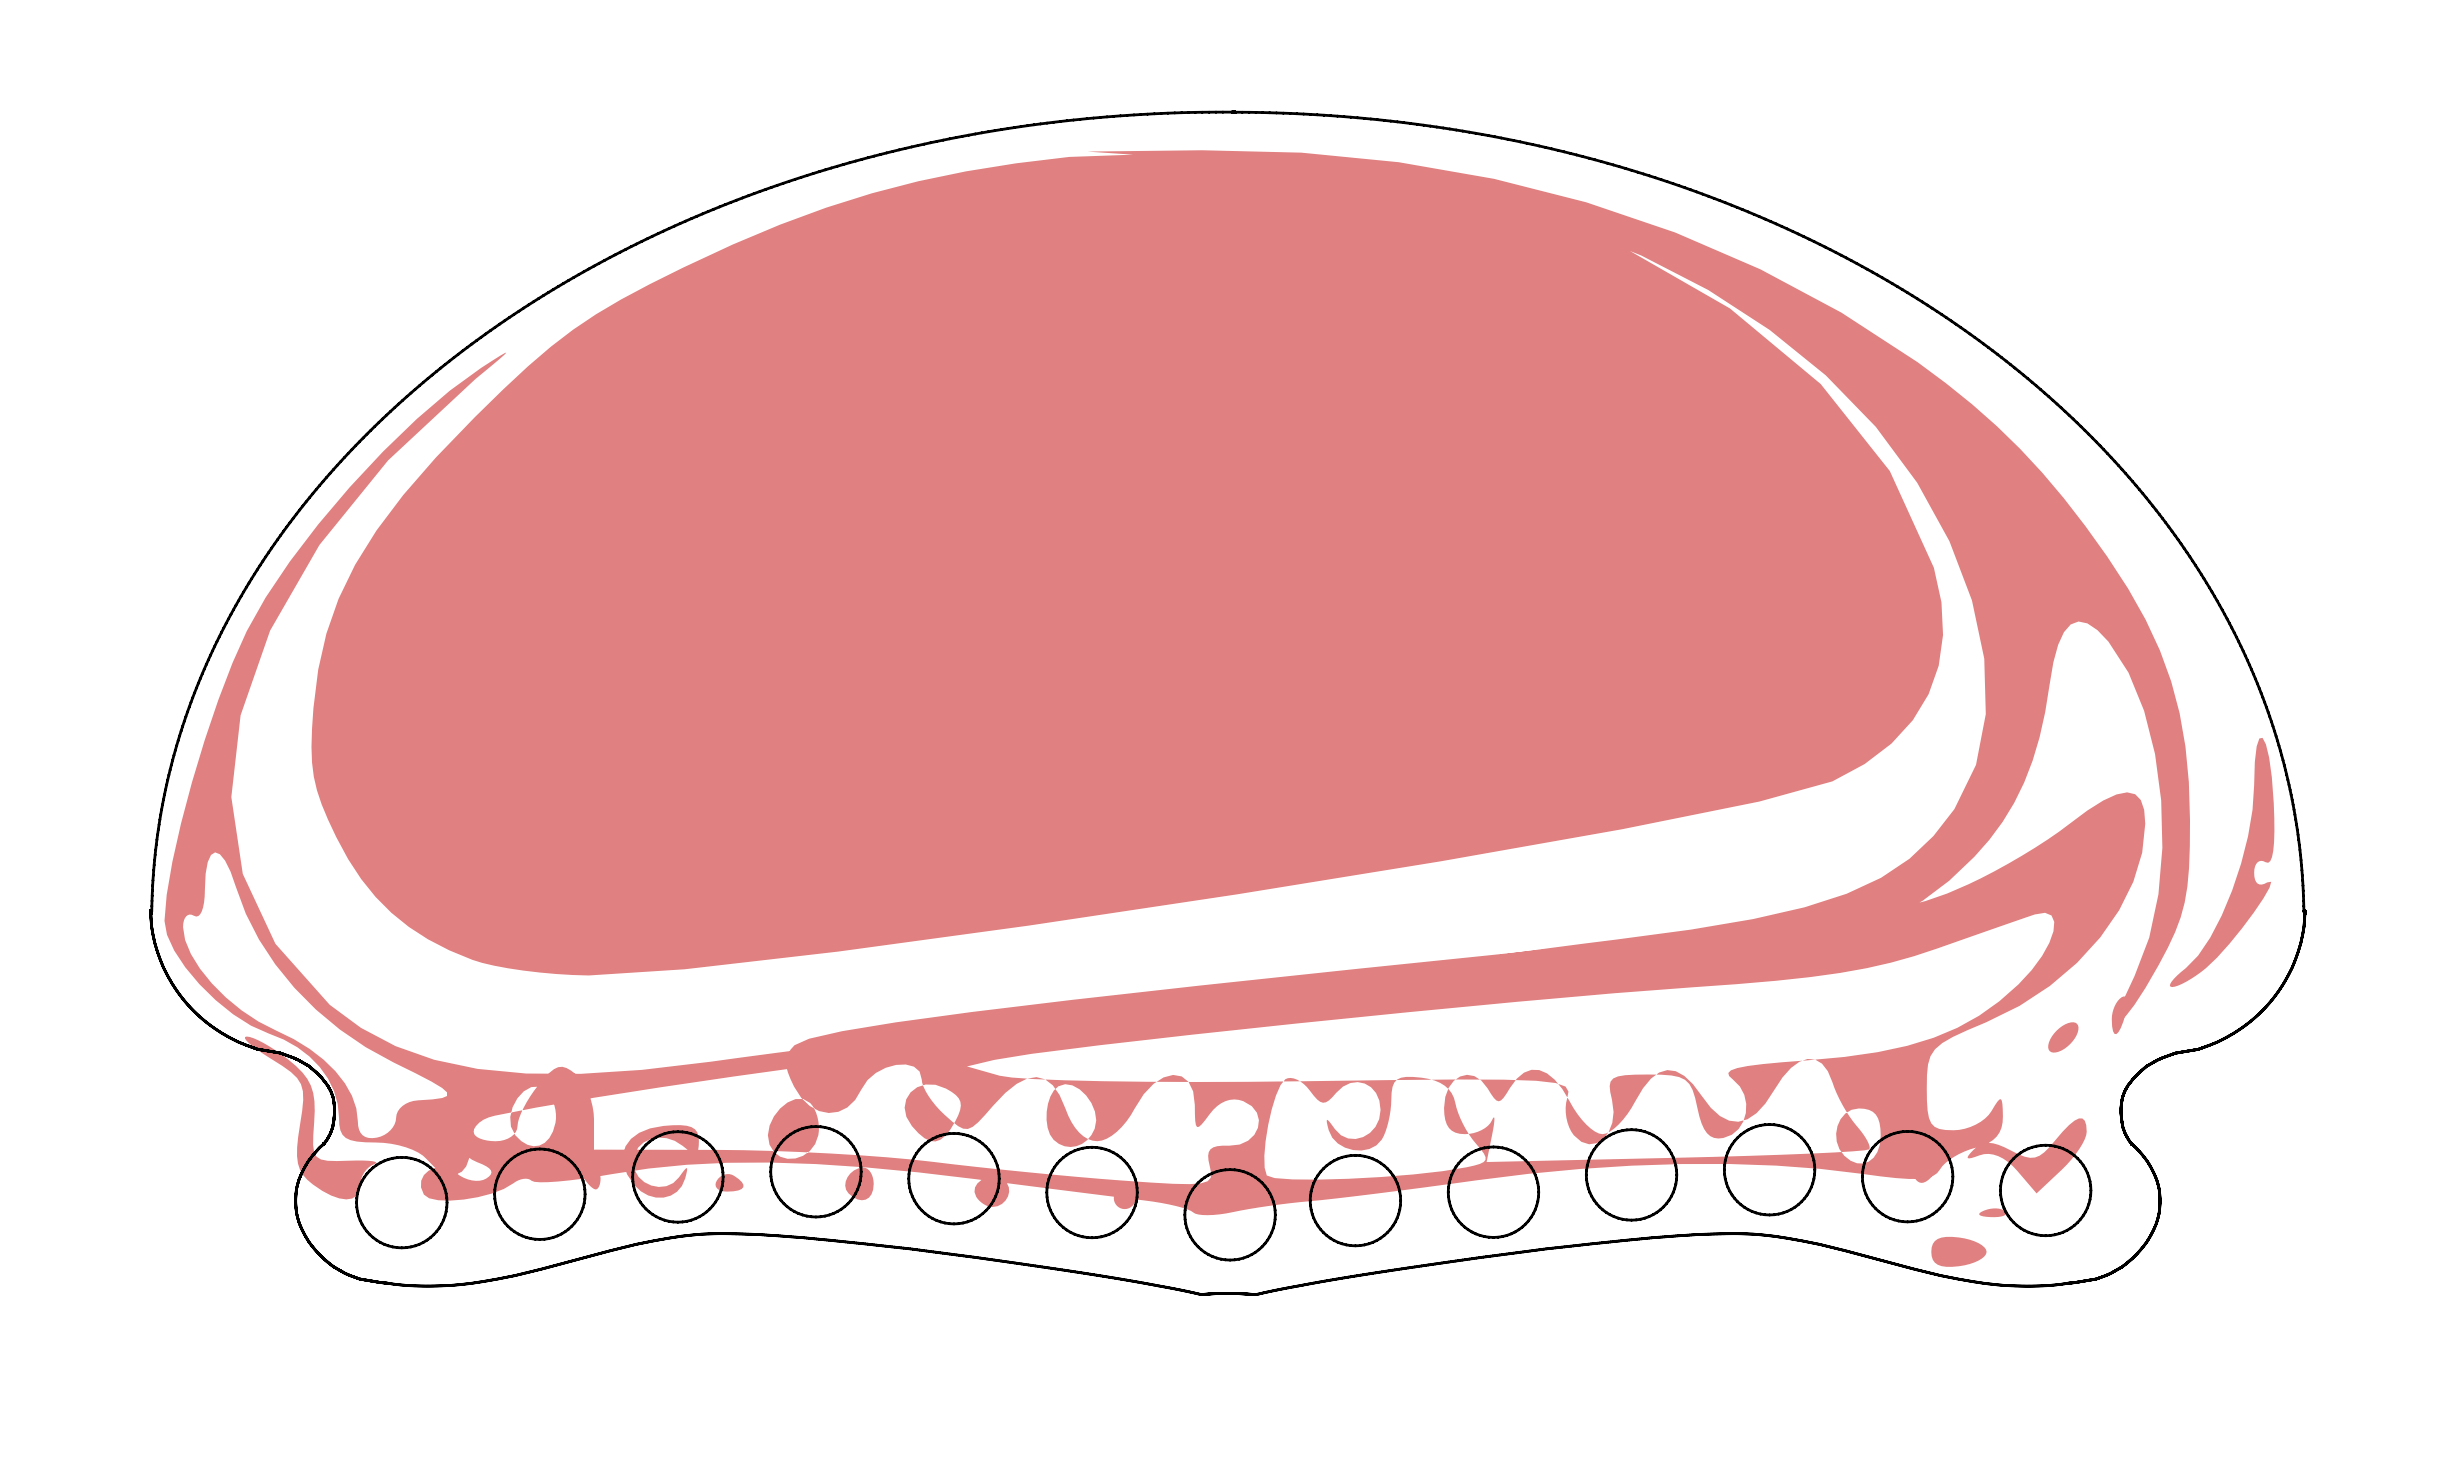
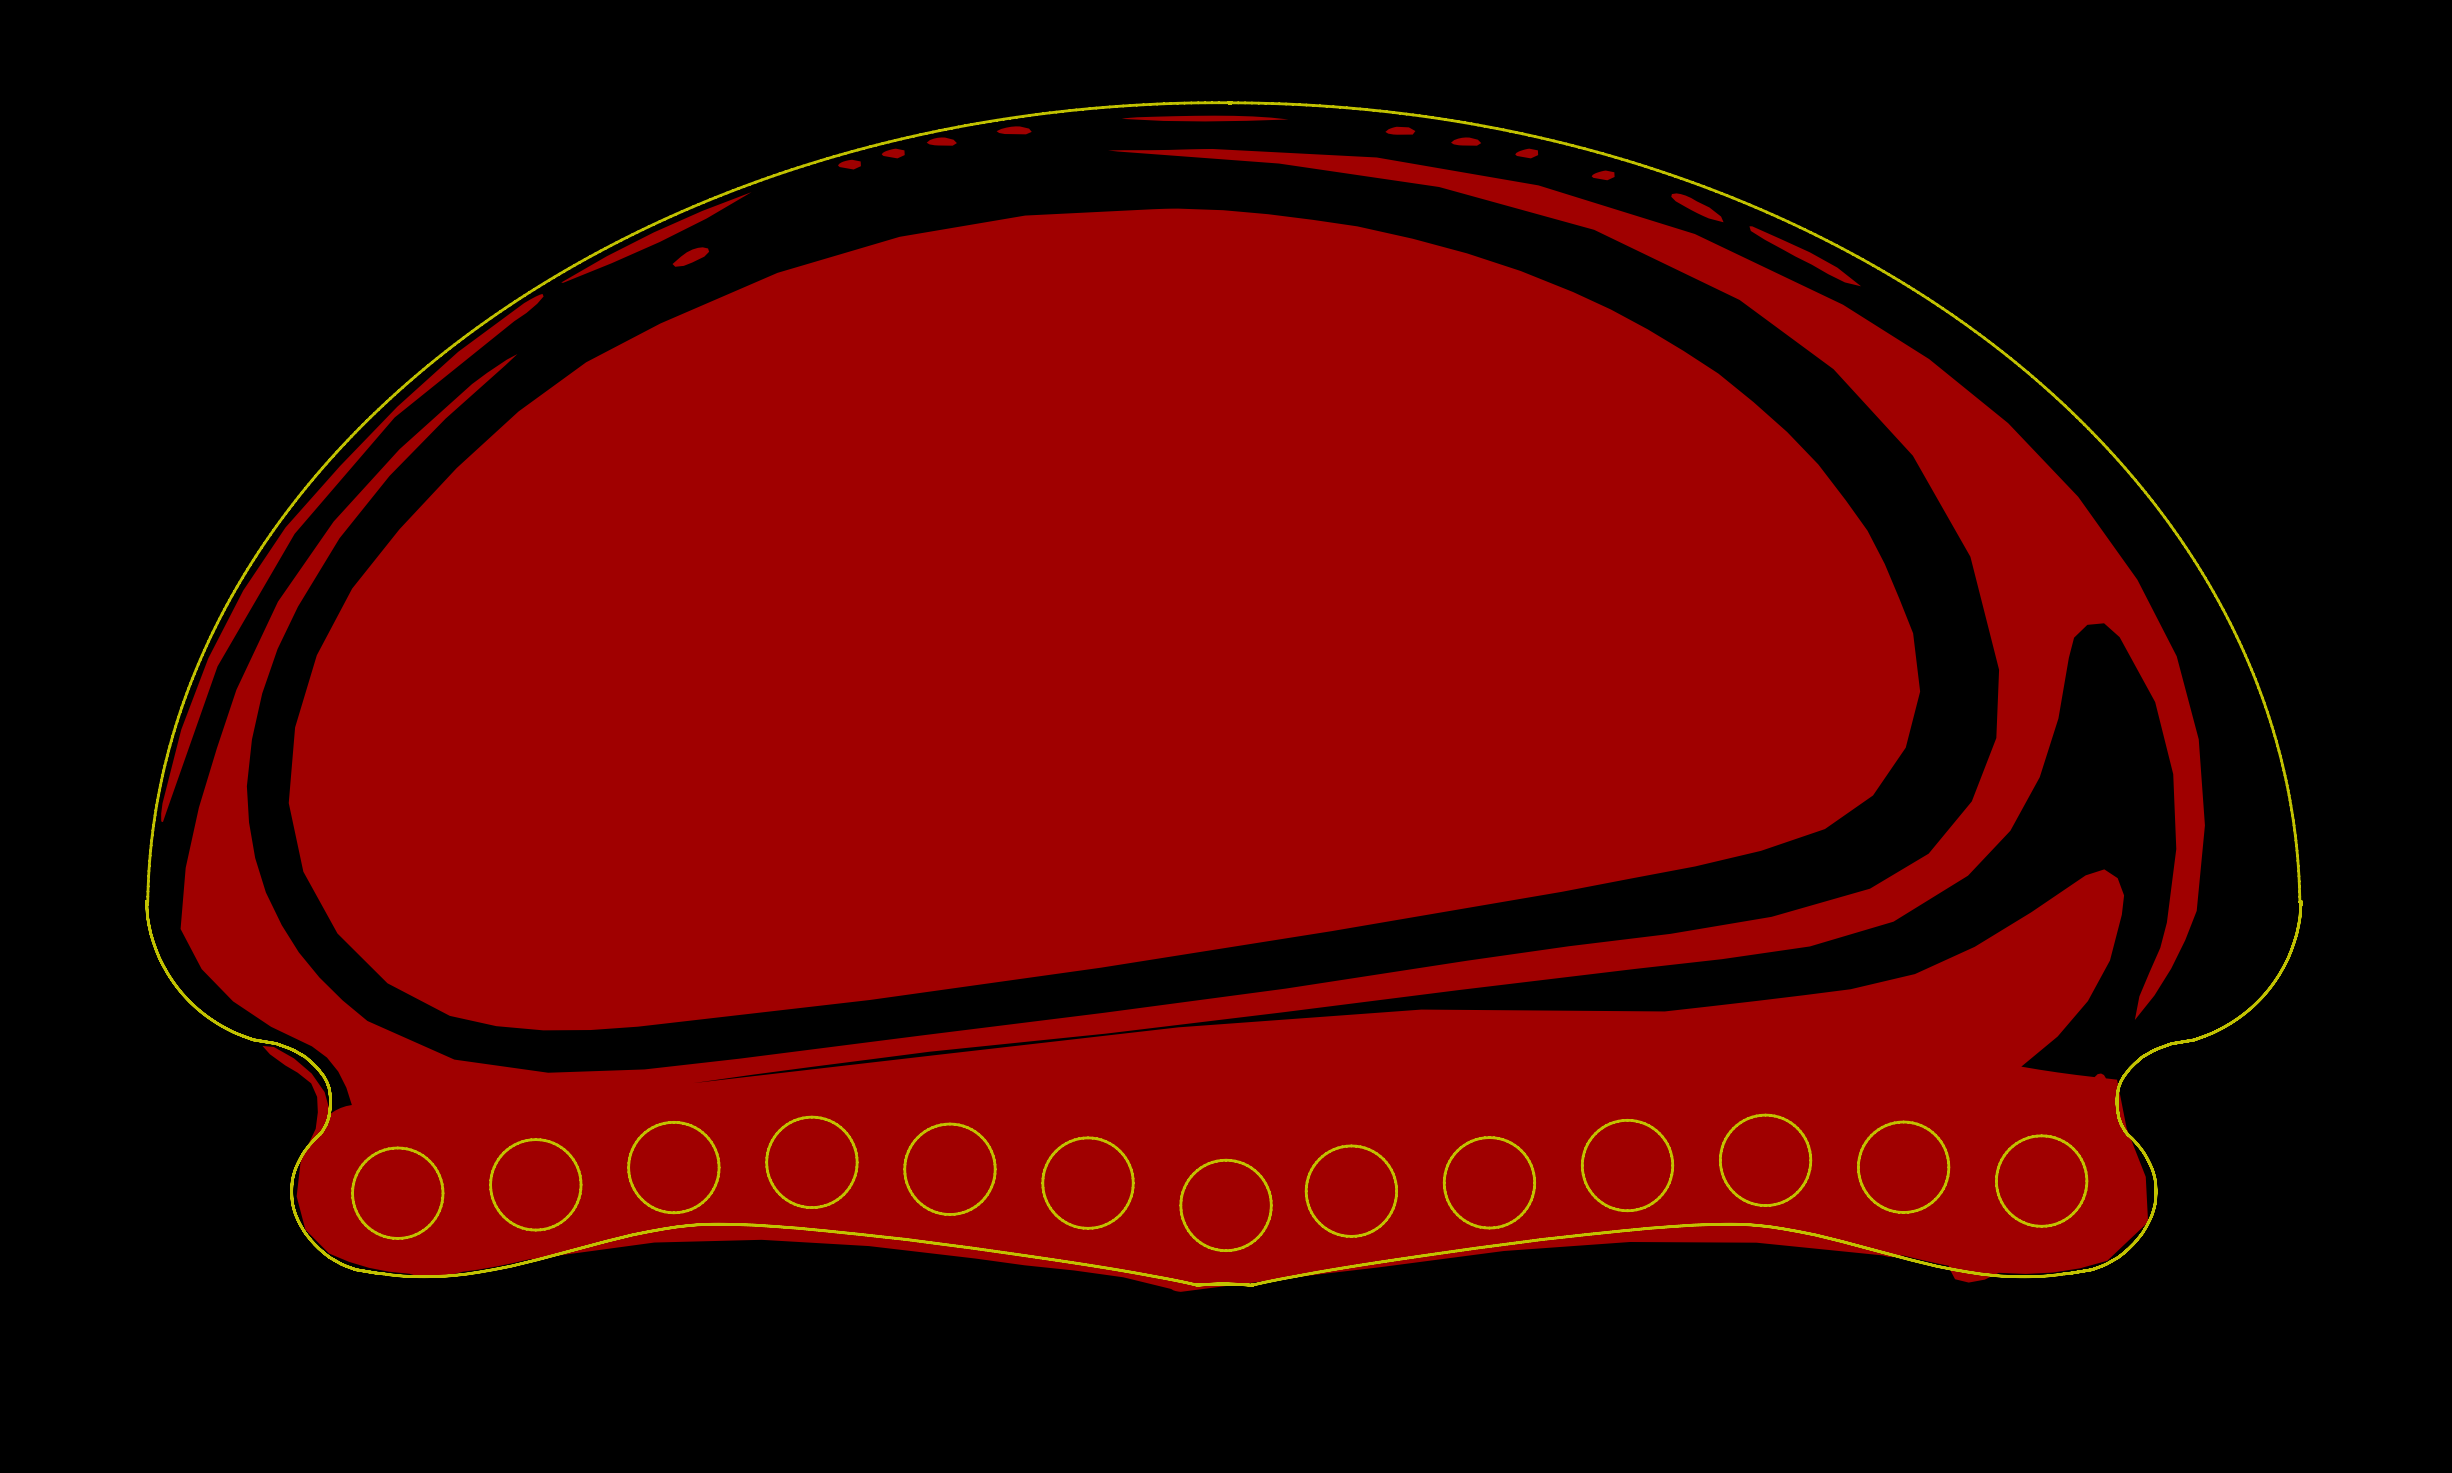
drawing shape: [149, 110, 2307, 1297] -> [145, 101, 2303, 1292]

